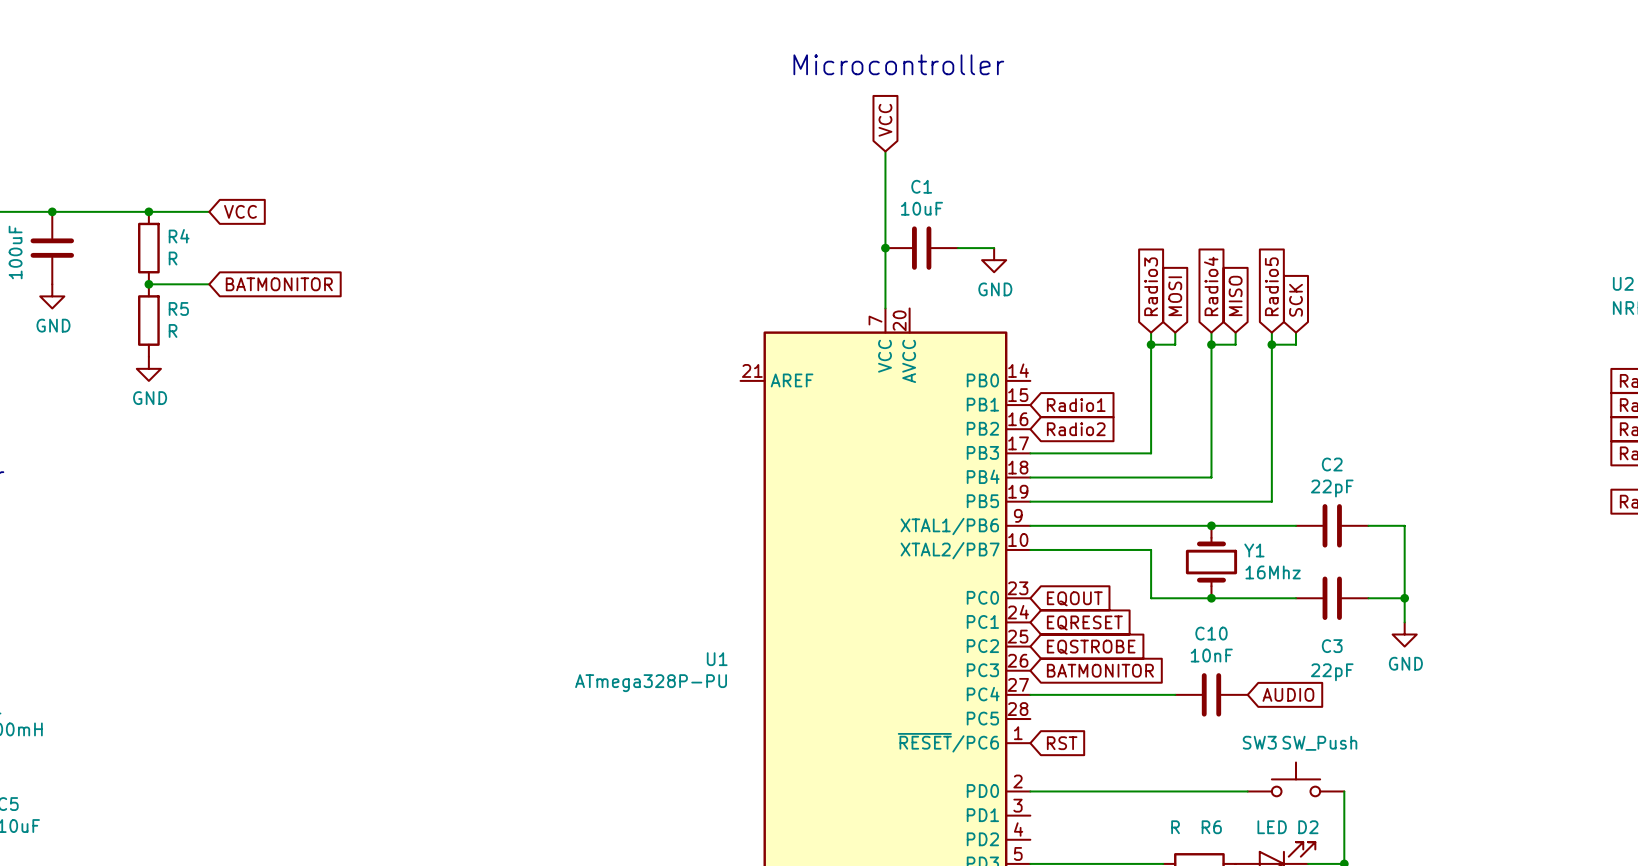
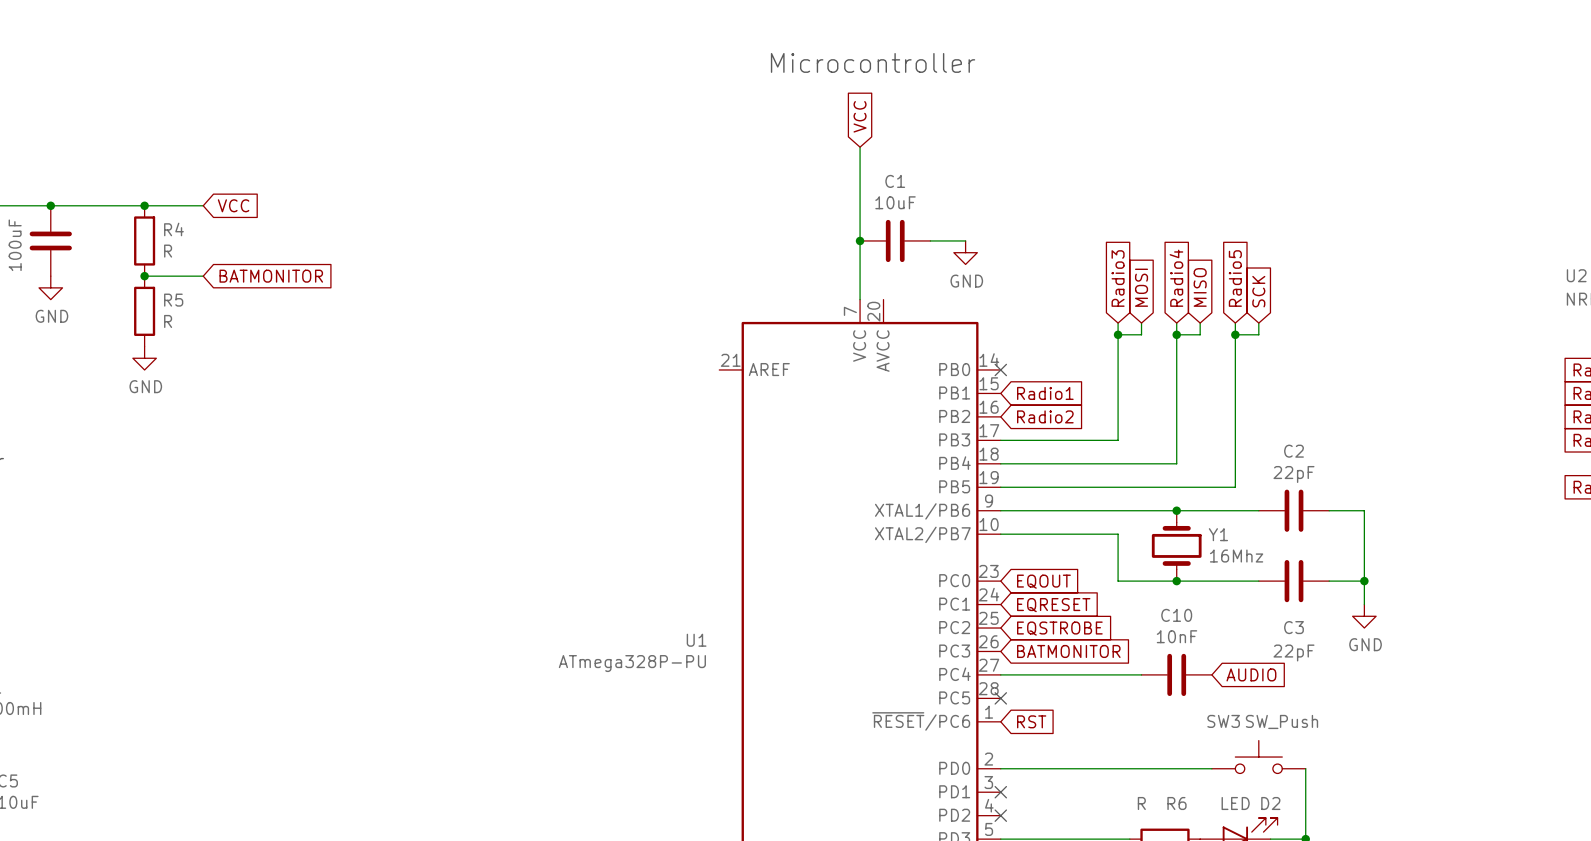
no-connect mark: none -> (1000, 369)
no-connect mark: none -> (1000, 698)
no-connect mark: none -> (1000, 792)
no-connect mark: none -> (1000, 815)

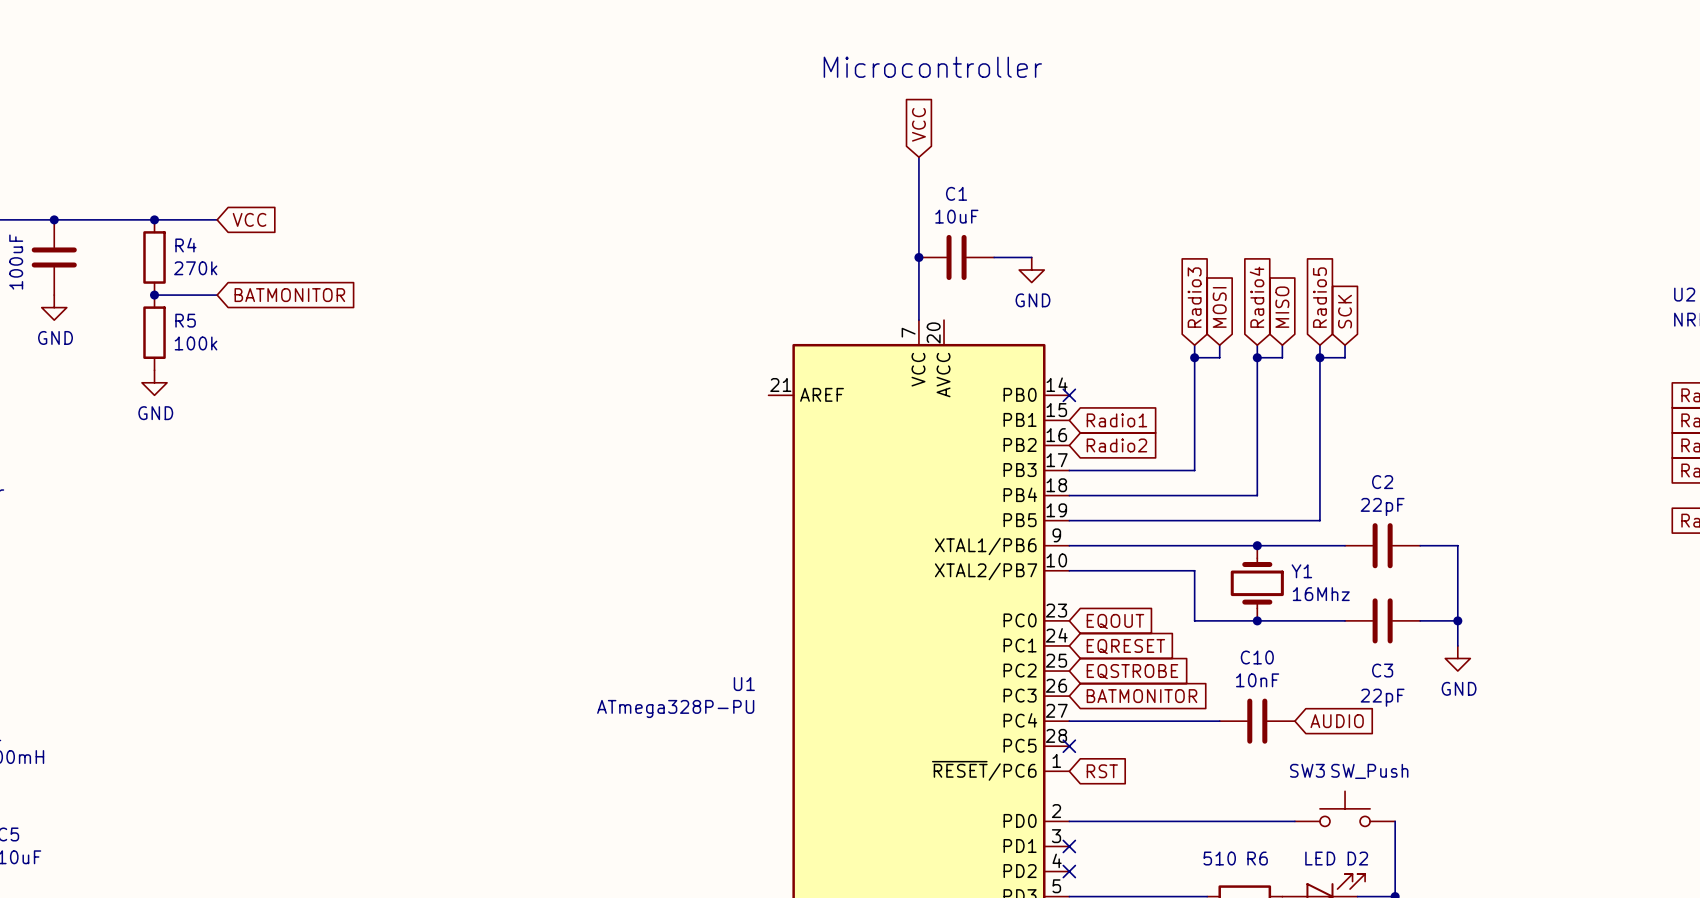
R4 value: R (168, 251) -> 270k (195, 268)
R5 value: R (168, 321) -> 100k (196, 343)
R6 value: R (1141, 803) -> 510 (1219, 858)

